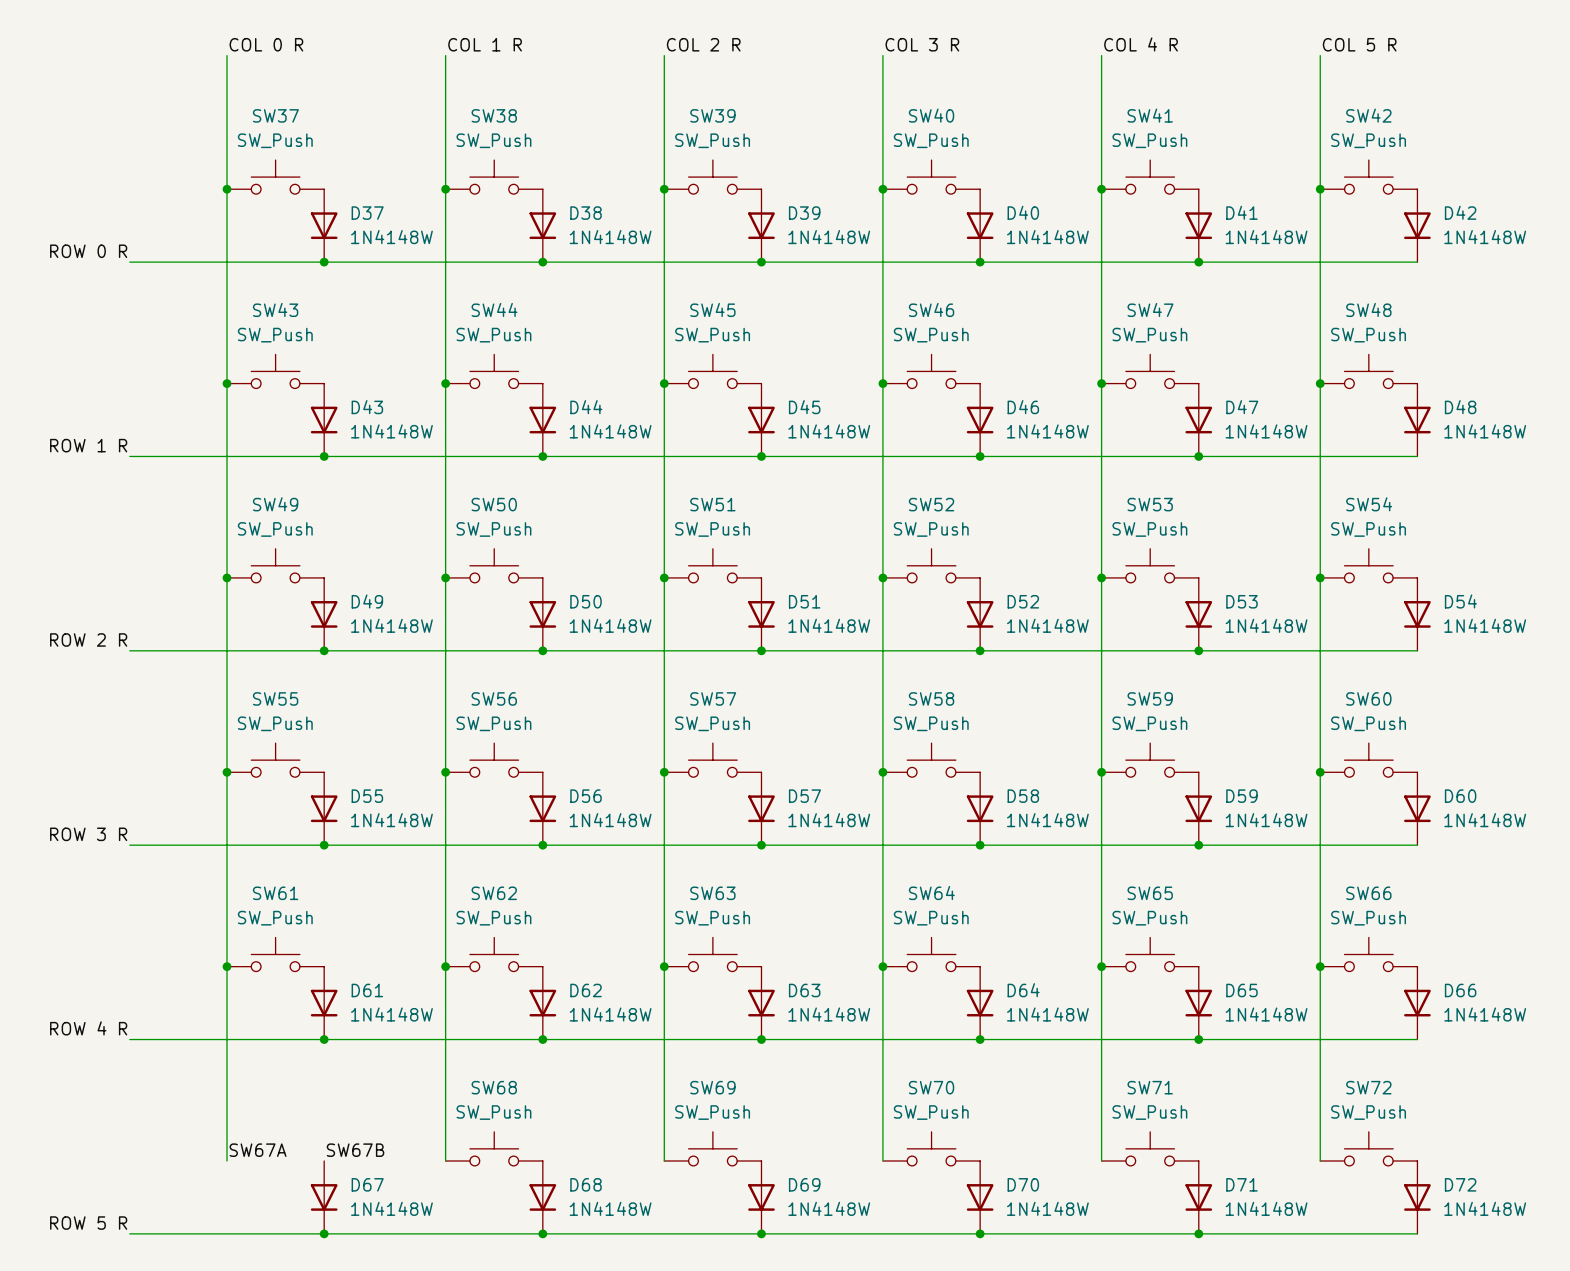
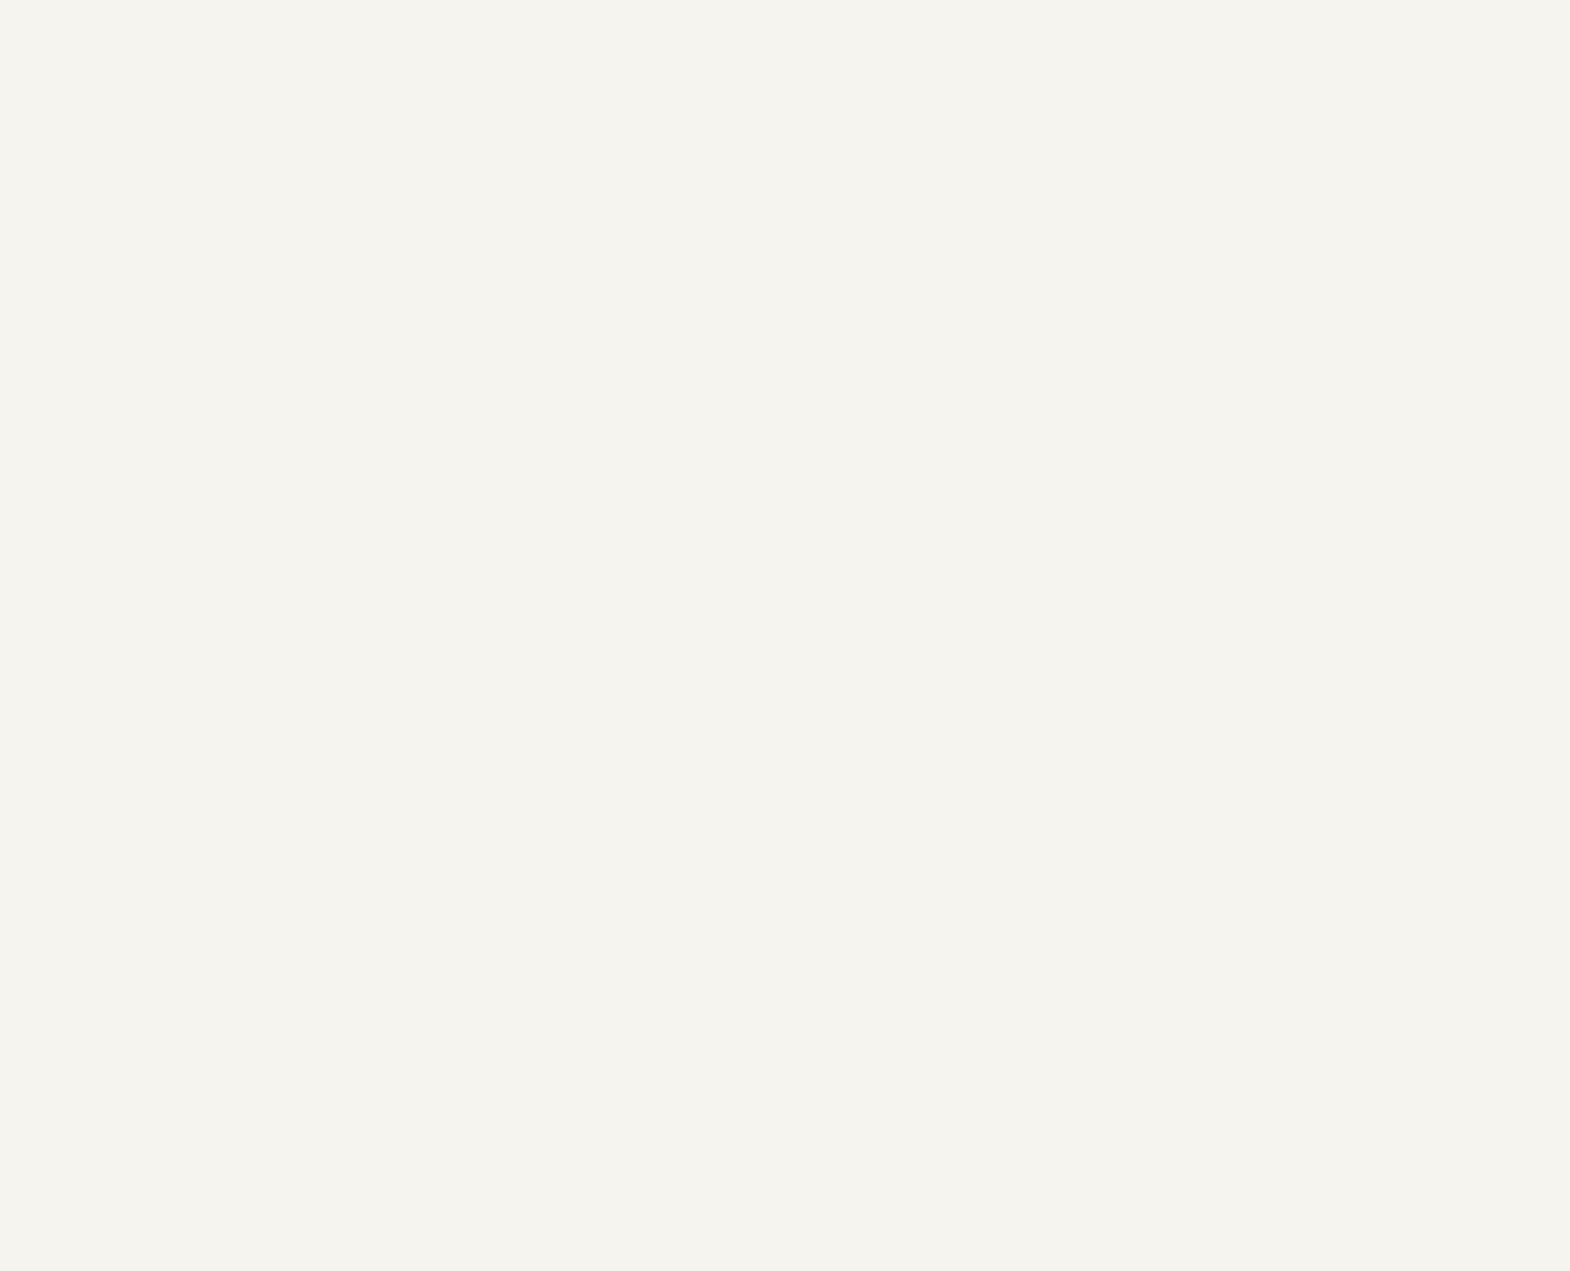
label: COL 0 R (266, 44) -> none
label: COL 1 R (485, 44) -> none
label: COL 2 R (703, 44) -> none
label: COL 3 R (922, 44) -> none
label: COL 4 R (1141, 44) -> none
label: COL 5 R (1359, 44) -> none
wire: (227, 55) (227, 1161) -> none
wire: (445, 55) (445, 1161) -> none
wire: (664, 55) (664, 1161) -> none
wire: (882, 55) (882, 1161) -> none
wire: (1101, 55) (1101, 1161) -> none
wire: (1320, 55) (1320, 1161) -> none
SW37: SW_Push (275, 177) -> none
SW38: SW_Push (494, 177) -> none
SW39: SW_Push (712, 177) -> none
SW40: SW_Push (931, 177) -> none
SW41: SW_Push (1150, 177) -> none
SW42: SW_Push (1368, 177) -> none
junction: (227, 189) -> none
junction: (445, 189) -> none
junction: (664, 189) -> none
junction: (882, 189) -> none
junction: (1101, 189) -> none
junction: (1320, 189) -> none
D37: 1N4148W (324, 225) -> none
D38: 1N4148W (542, 225) -> none
D39: 1N4148W (761, 225) -> none
D40: 1N4148W (980, 225) -> none
D41: 1N4148W (1198, 225) -> none
D42: 1N4148W (1417, 225) -> none
label: ROW 0 R (88, 251) -> none
wire: (129, 262) (1417, 262) -> none
junction: (324, 262) -> none
junction: (542, 262) -> none
junction: (761, 262) -> none
junction: (980, 262) -> none
junction: (1198, 262) -> none
SW43: SW_Push (275, 371) -> none
SW44: SW_Push (494, 371) -> none
SW45: SW_Push (712, 371) -> none
SW46: SW_Push (931, 371) -> none
SW47: SW_Push (1150, 371) -> none
SW48: SW_Push (1368, 371) -> none
junction: (227, 383) -> none
junction: (445, 383) -> none
junction: (664, 383) -> none
junction: (882, 383) -> none
junction: (1101, 383) -> none
junction: (1320, 383) -> none
D43: 1N4148W (324, 420) -> none
D44: 1N4148W (542, 420) -> none
D45: 1N4148W (761, 420) -> none
D46: 1N4148W (980, 420) -> none
D47: 1N4148W (1198, 420) -> none
D48: 1N4148W (1417, 420) -> none
label: ROW 1 R (88, 445) -> none
wire: (129, 456) (1417, 456) -> none
junction: (324, 456) -> none
junction: (542, 456) -> none
junction: (761, 456) -> none
junction: (980, 456) -> none
junction: (1198, 456) -> none
SW49: SW_Push (275, 565) -> none
SW50: SW_Push (494, 565) -> none
SW51: SW_Push (712, 565) -> none
SW52: SW_Push (931, 565) -> none
SW53: SW_Push (1150, 565) -> none
SW54: SW_Push (1368, 565) -> none
junction: (227, 577) -> none
junction: (445, 577) -> none
junction: (664, 577) -> none
junction: (882, 577) -> none
junction: (1101, 577) -> none
junction: (1320, 577) -> none
D49: 1N4148W (324, 614) -> none
D50: 1N4148W (542, 614) -> none
D51: 1N4148W (761, 614) -> none
D52: 1N4148W (980, 614) -> none
D53: 1N4148W (1198, 614) -> none
D54: 1N4148W (1417, 614) -> none
label: ROW 2 R (88, 639) -> none
wire: (129, 650) (1417, 650) -> none
junction: (324, 650) -> none
junction: (542, 650) -> none
junction: (761, 650) -> none
junction: (980, 650) -> none
junction: (1198, 650) -> none
SW55: SW_Push (275, 760) -> none
SW56: SW_Push (494, 760) -> none
SW57: SW_Push (712, 760) -> none
SW58: SW_Push (931, 760) -> none
SW59: SW_Push (1150, 760) -> none
SW60: SW_Push (1368, 760) -> none
junction: (227, 772) -> none
junction: (445, 772) -> none
junction: (664, 772) -> none
junction: (882, 772) -> none
junction: (1101, 772) -> none
junction: (1320, 772) -> none
D55: 1N4148W (324, 808) -> none
D56: 1N4148W (542, 808) -> none
D57: 1N4148W (761, 808) -> none
D58: 1N4148W (980, 808) -> none
D59: 1N4148W (1198, 808) -> none
D60: 1N4148W (1417, 808) -> none
label: ROW 3 R (88, 834) -> none
wire: (129, 845) (1417, 845) -> none
junction: (324, 845) -> none
junction: (542, 845) -> none
junction: (761, 845) -> none
junction: (980, 845) -> none
junction: (1198, 845) -> none
SW61: SW_Push (275, 954) -> none
SW62: SW_Push (494, 954) -> none
SW63: SW_Push (712, 954) -> none
SW64: SW_Push (931, 954) -> none
SW65: SW_Push (1150, 954) -> none
SW66: SW_Push (1368, 954) -> none
junction: (227, 966) -> none
junction: (445, 966) -> none
junction: (664, 966) -> none
junction: (882, 966) -> none
junction: (1101, 966) -> none
junction: (1320, 966) -> none
D61: 1N4148W (324, 1003) -> none
D62: 1N4148W (542, 1003) -> none
D63: 1N4148W (761, 1003) -> none
D64: 1N4148W (980, 1003) -> none
D65: 1N4148W (1198, 1003) -> none
D66: 1N4148W (1417, 1003) -> none
label: ROW 4 R (88, 1028) -> none
wire: (129, 1039) (1417, 1039) -> none
junction: (324, 1039) -> none
junction: (542, 1039) -> none
junction: (761, 1039) -> none
junction: (980, 1039) -> none
junction: (1198, 1039) -> none
SW68: SW_Push (494, 1148) -> none
SW69: SW_Push (712, 1148) -> none
SW70: SW_Push (931, 1148) -> none
SW71: SW_Push (1150, 1148) -> none
SW72: SW_Push (1368, 1148) -> none
label: SW67A (258, 1150) -> none
label: SW67B (355, 1150) -> none
D67: 1N4148W (324, 1197) -> none
D68: 1N4148W (542, 1197) -> none
D69: 1N4148W (761, 1197) -> none
D70: 1N4148W (980, 1197) -> none
D71: 1N4148W (1198, 1197) -> none
D72: 1N4148W (1417, 1197) -> none
label: ROW 5 R (88, 1223) -> none
wire: (129, 1233) (1417, 1233) -> none
junction: (324, 1233) -> none
junction: (542, 1233) -> none
junction: (761, 1233) -> none
junction: (980, 1233) -> none
junction: (1198, 1233) -> none

